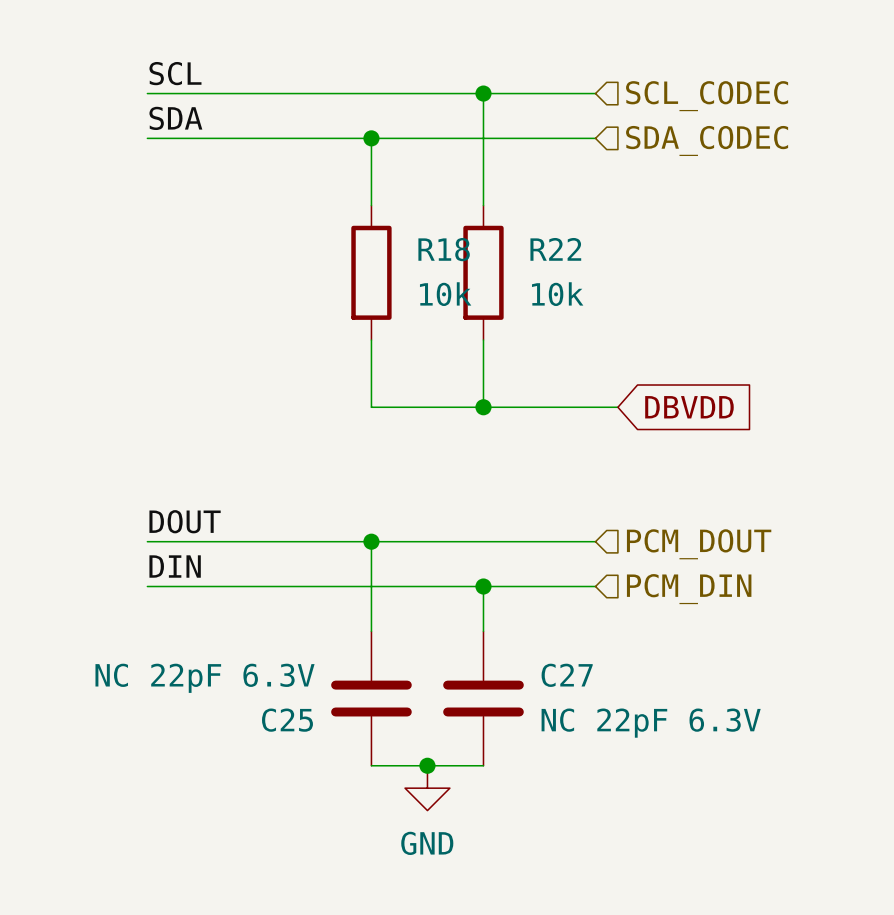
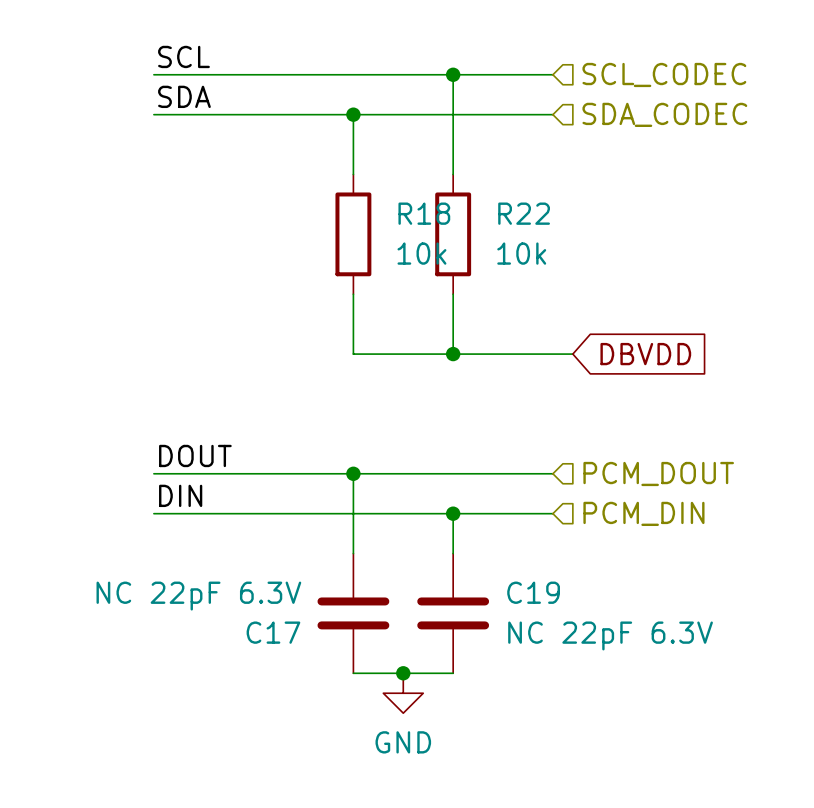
C27 name: C27 (567, 675) -> C19 (533, 592)
C25 name: C25 (287, 720) -> C17 (273, 632)

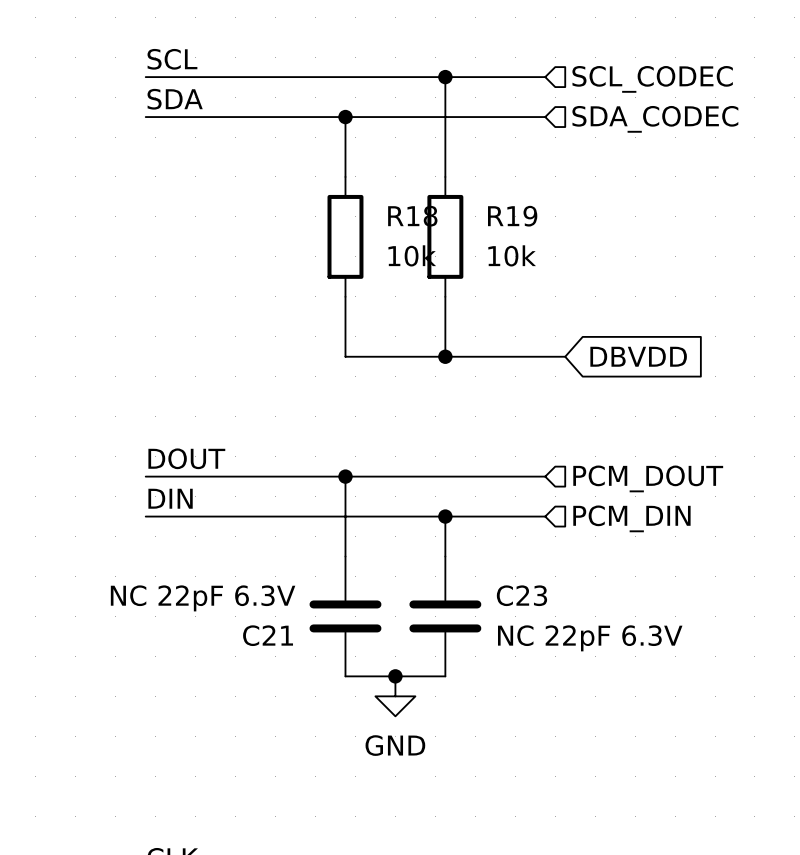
R22 name: R22 (524, 213) -> R19 (512, 216)
C19 name: C19 (533, 592) -> C23 (521, 595)
C17 name: C17 (273, 632) -> C21 (268, 635)

